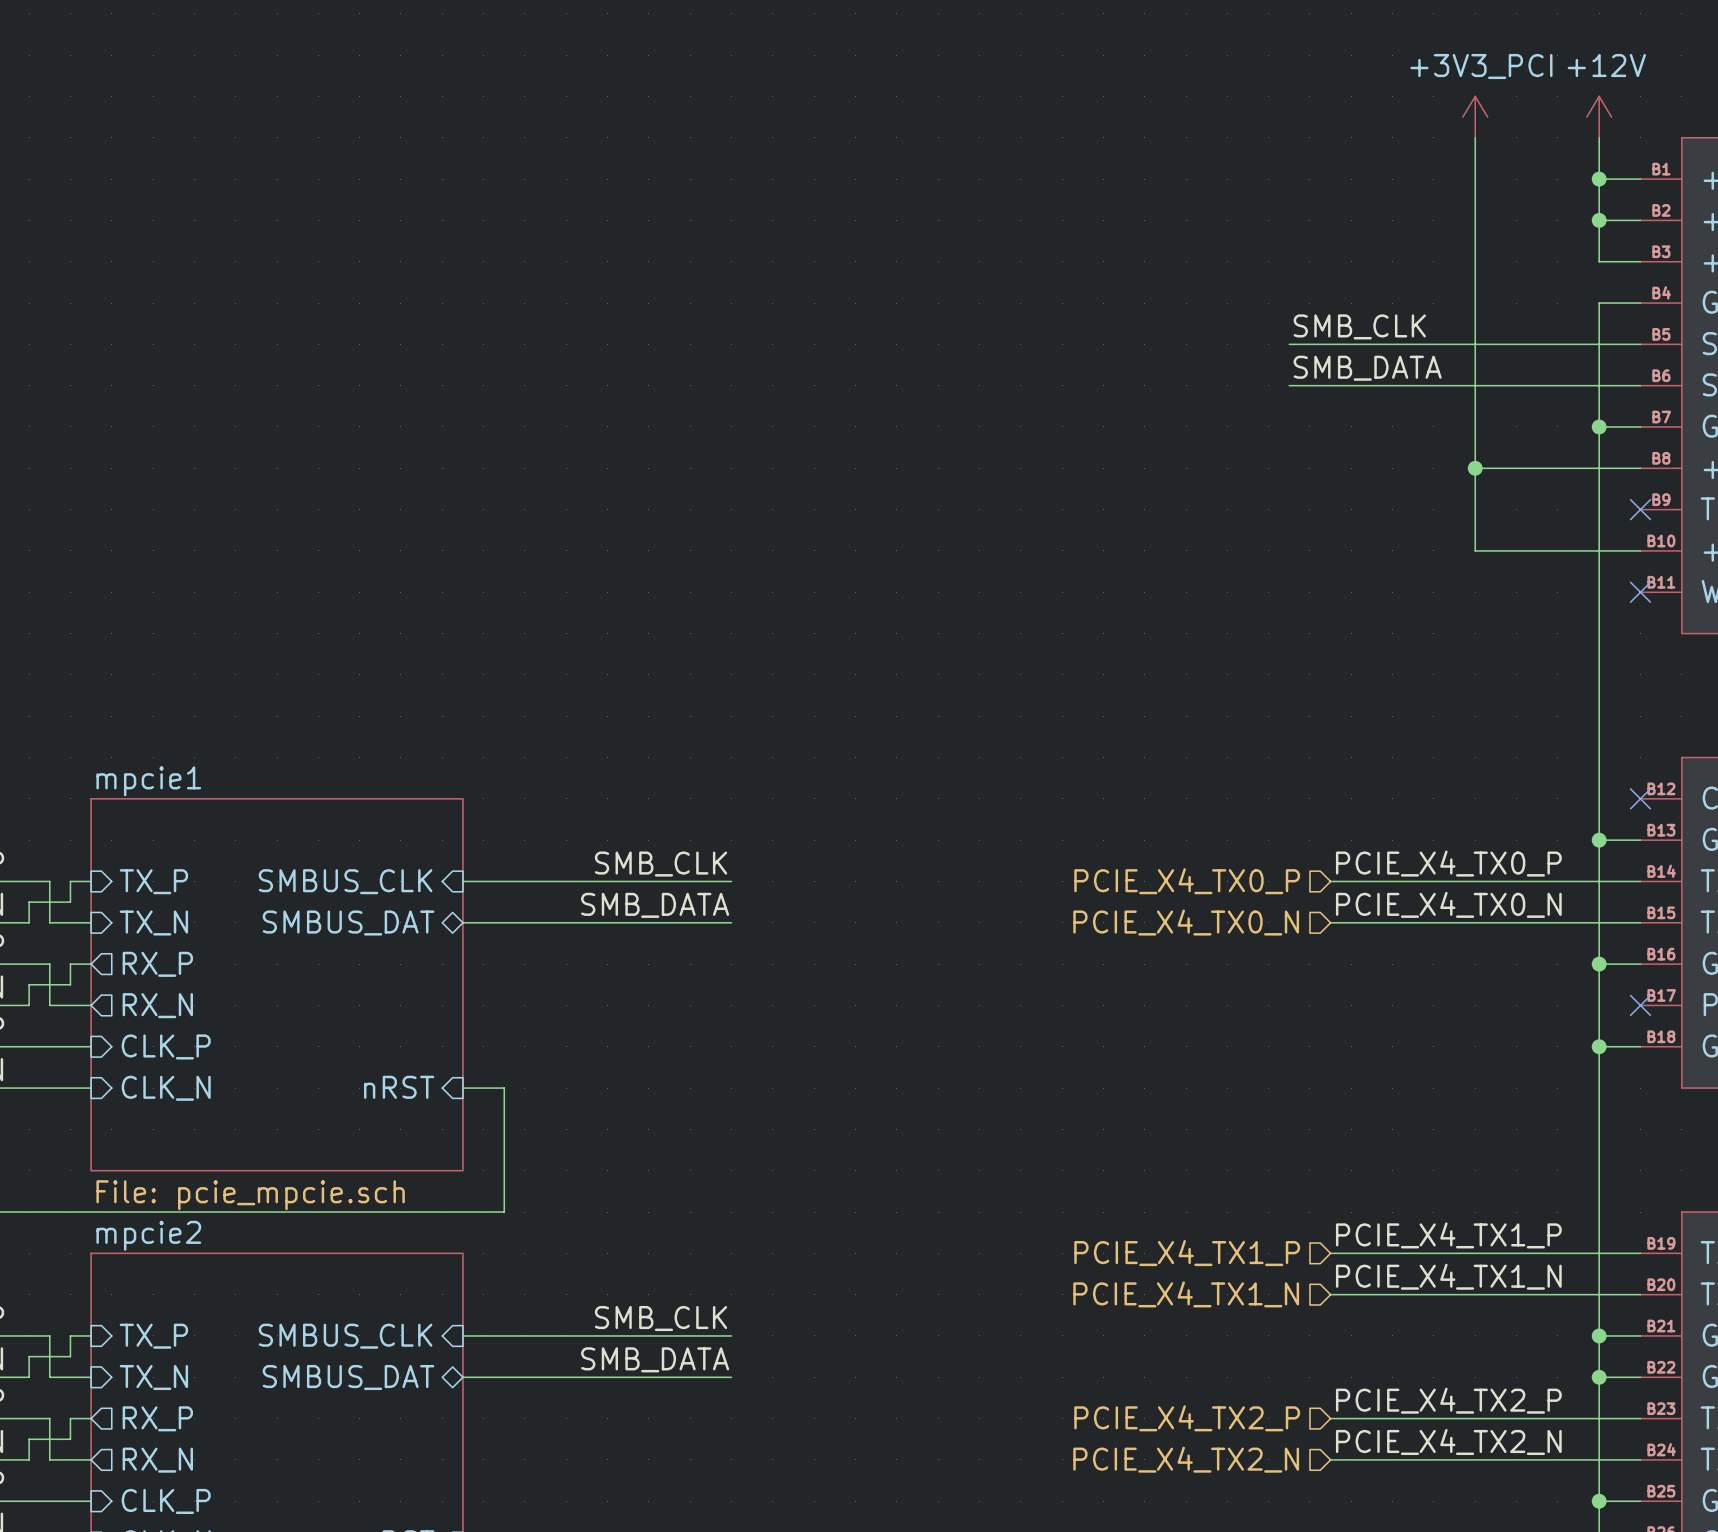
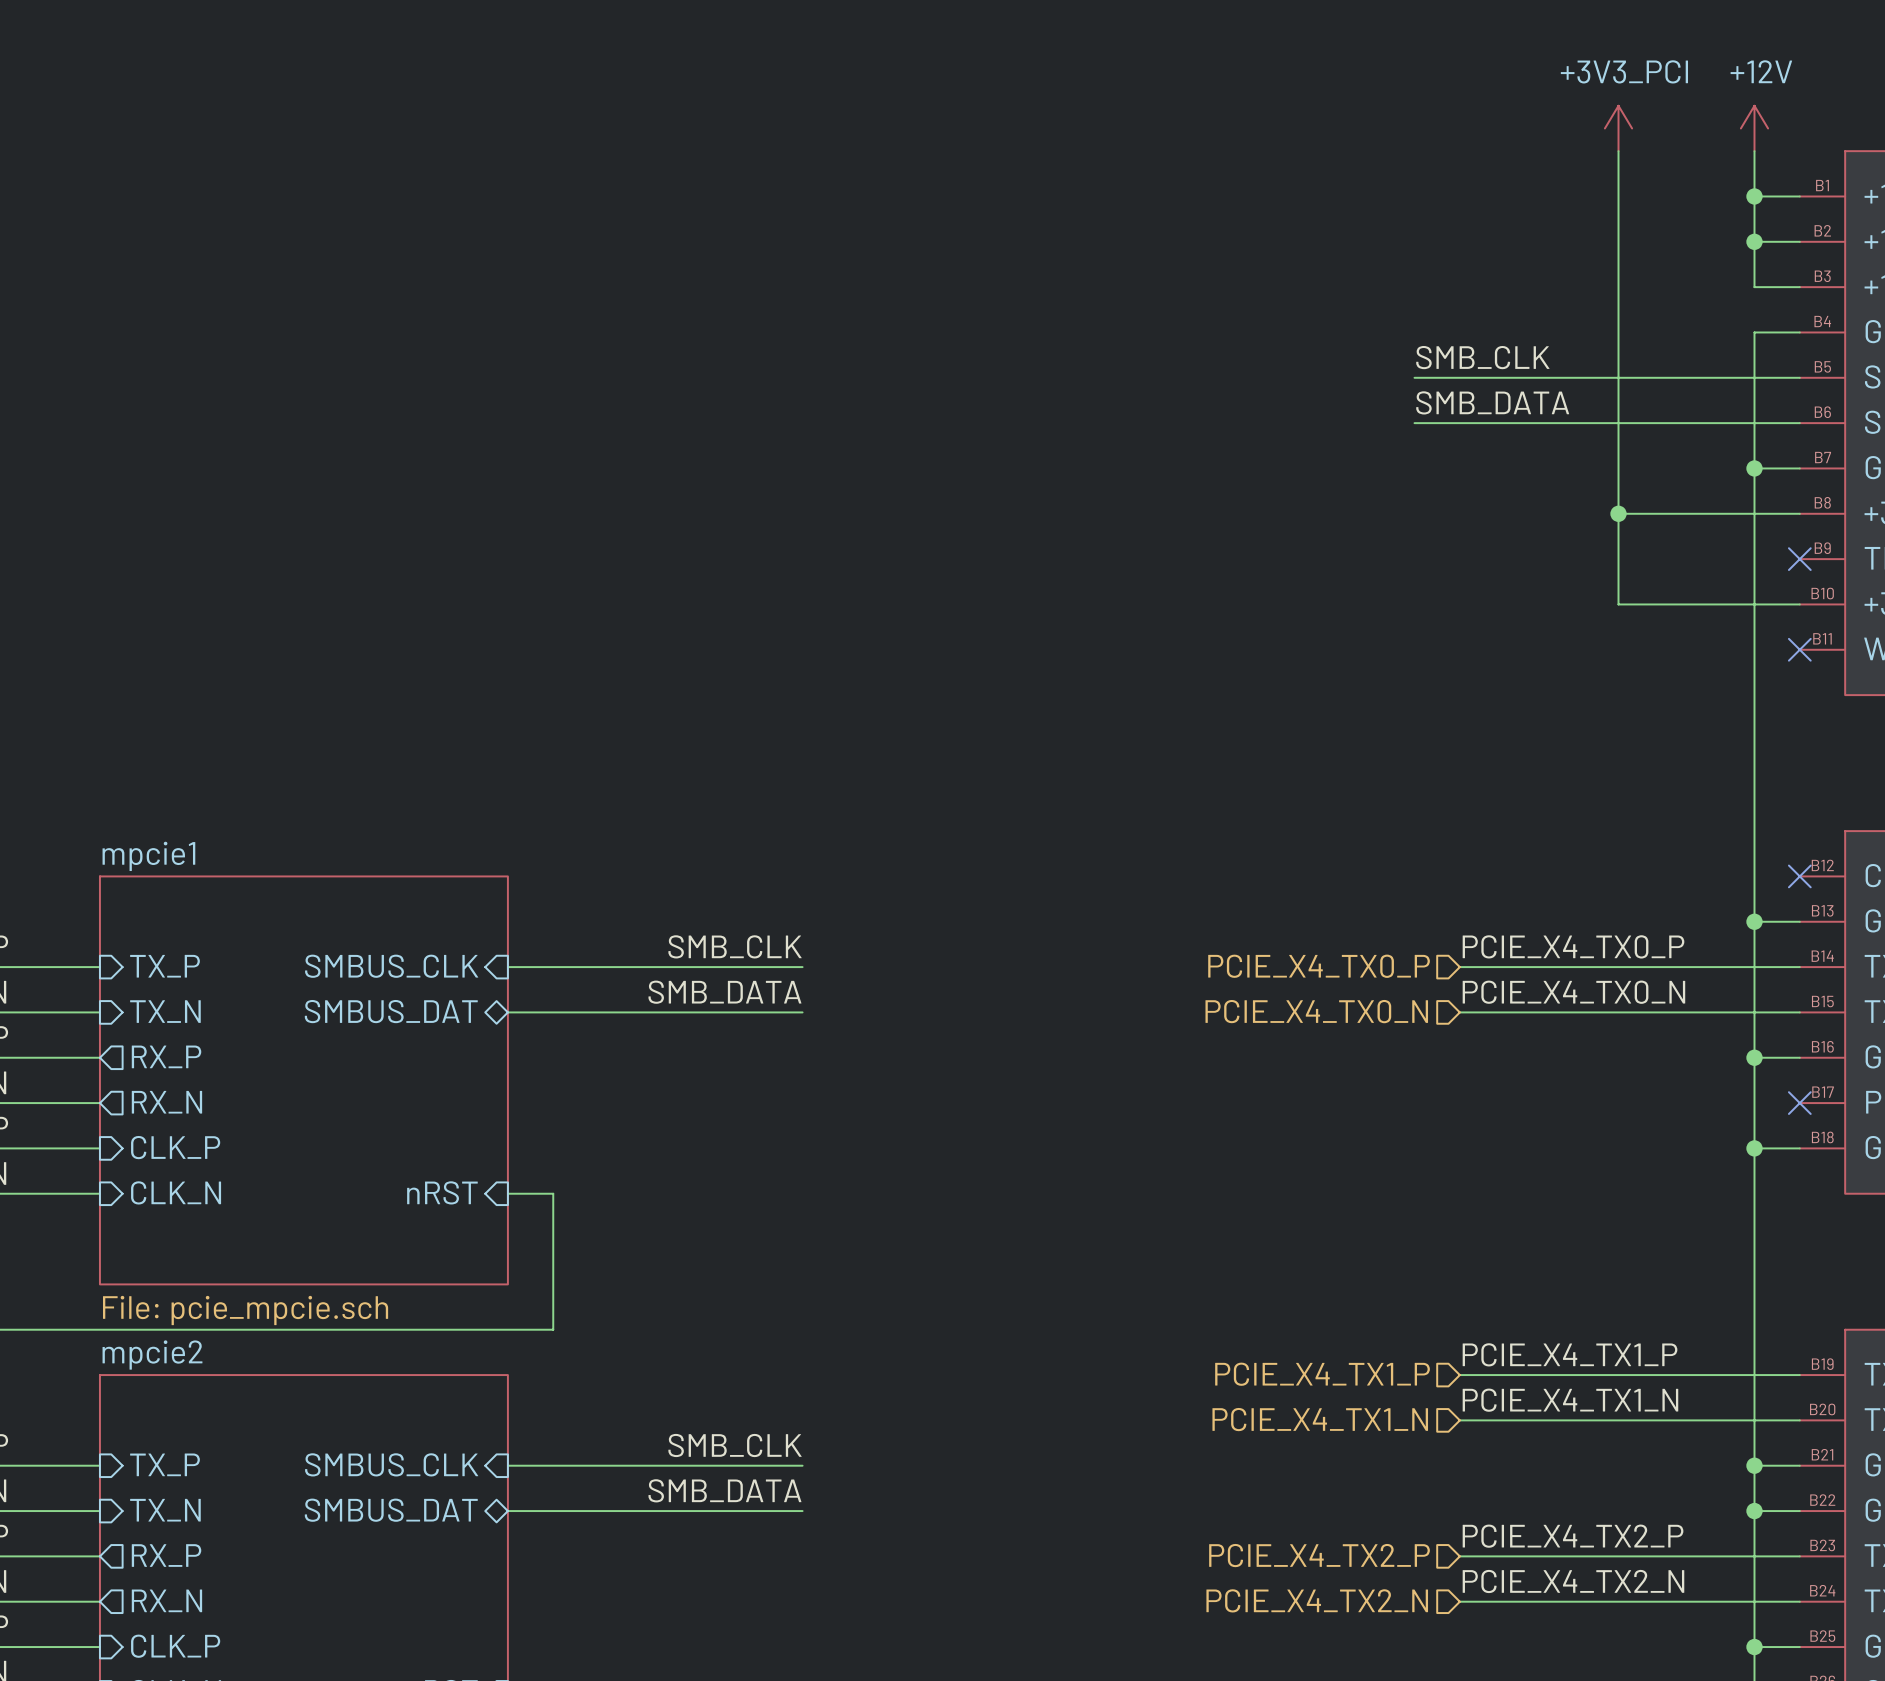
wire: (49, 881) (49, 922) -> (54, 967) (77, 967)
wire: (70, 881) (70, 902) (29, 902) (29, 922) -> (54, 1012) (31, 1012)
wire: (49, 964) (49, 1005) -> (54, 1057) (77, 1057)
wire: (70, 964) (70, 984) (29, 984) (29, 1005) -> (54, 1103) (31, 1103)
wire: (49, 1335) (49, 1377) -> (54, 1465) (77, 1465)
wire: (70, 1335) (70, 1356) (29, 1356) (29, 1377) -> (54, 1511) (31, 1511)
wire: (49, 1418) (49, 1459) -> (54, 1556) (77, 1556)
wire: (70, 1418) (70, 1439) (29, 1439) (29, 1459) -> (54, 1601) (31, 1601)

